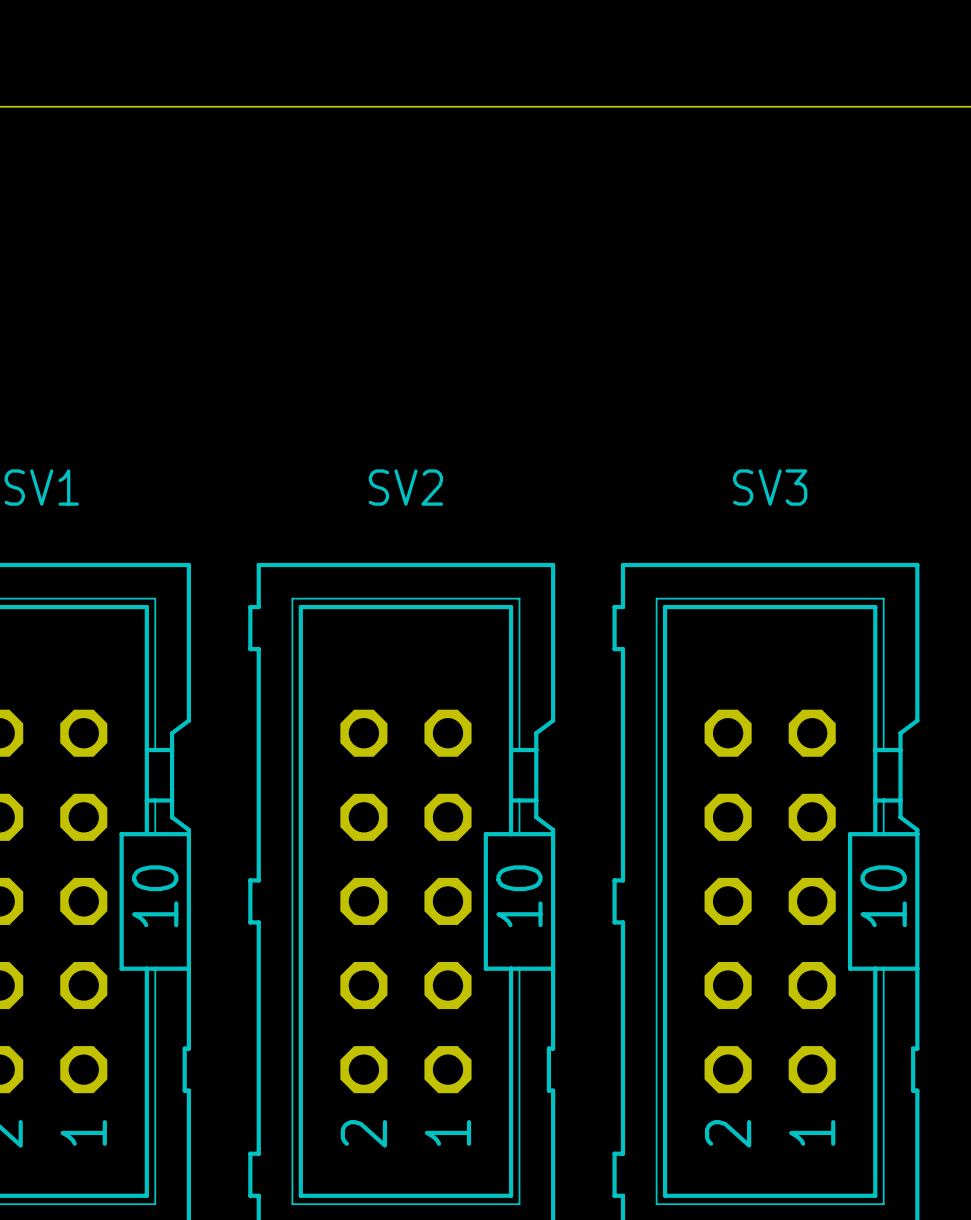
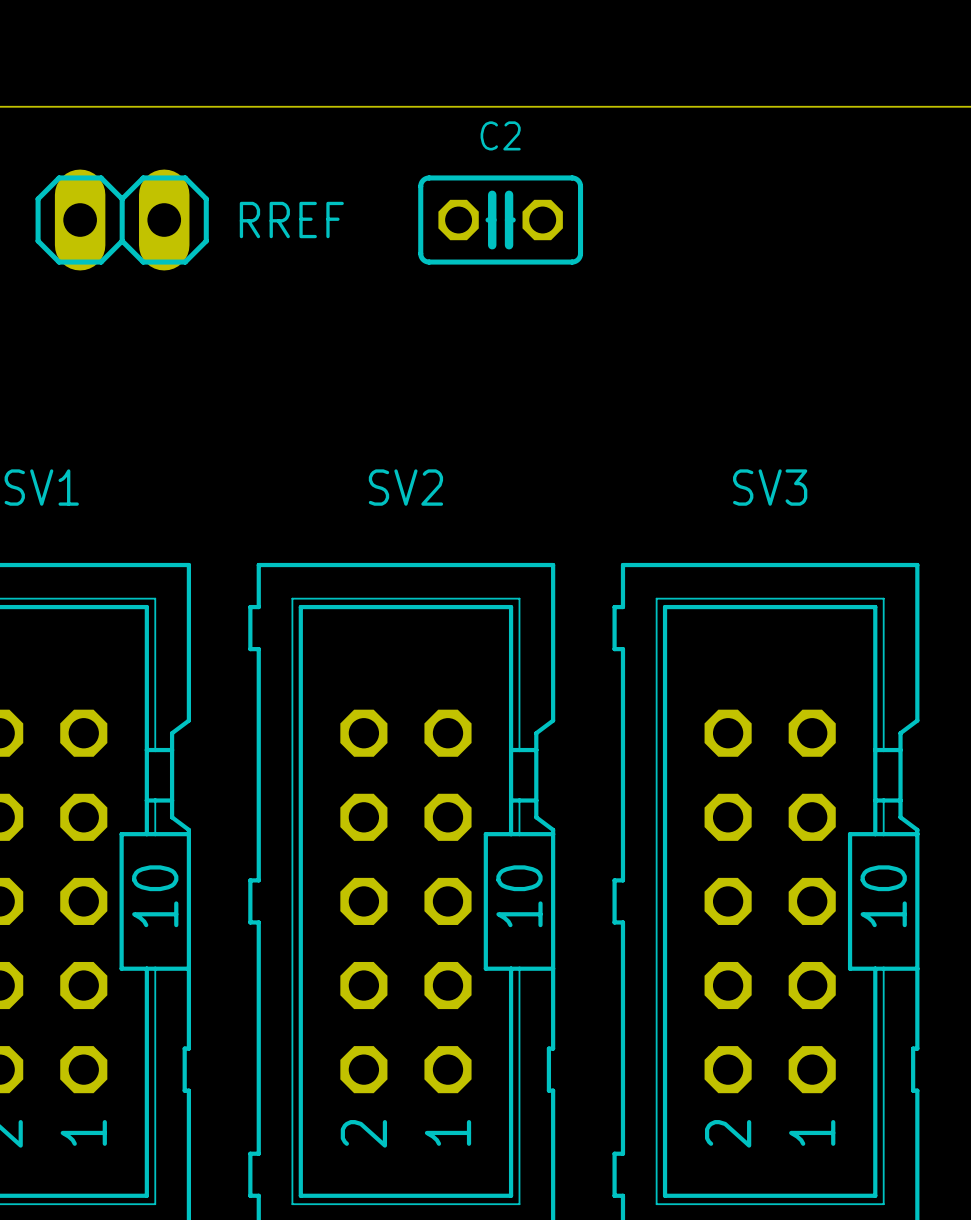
RREF: none -> (122, 220)
C2: none -> (500, 220)

